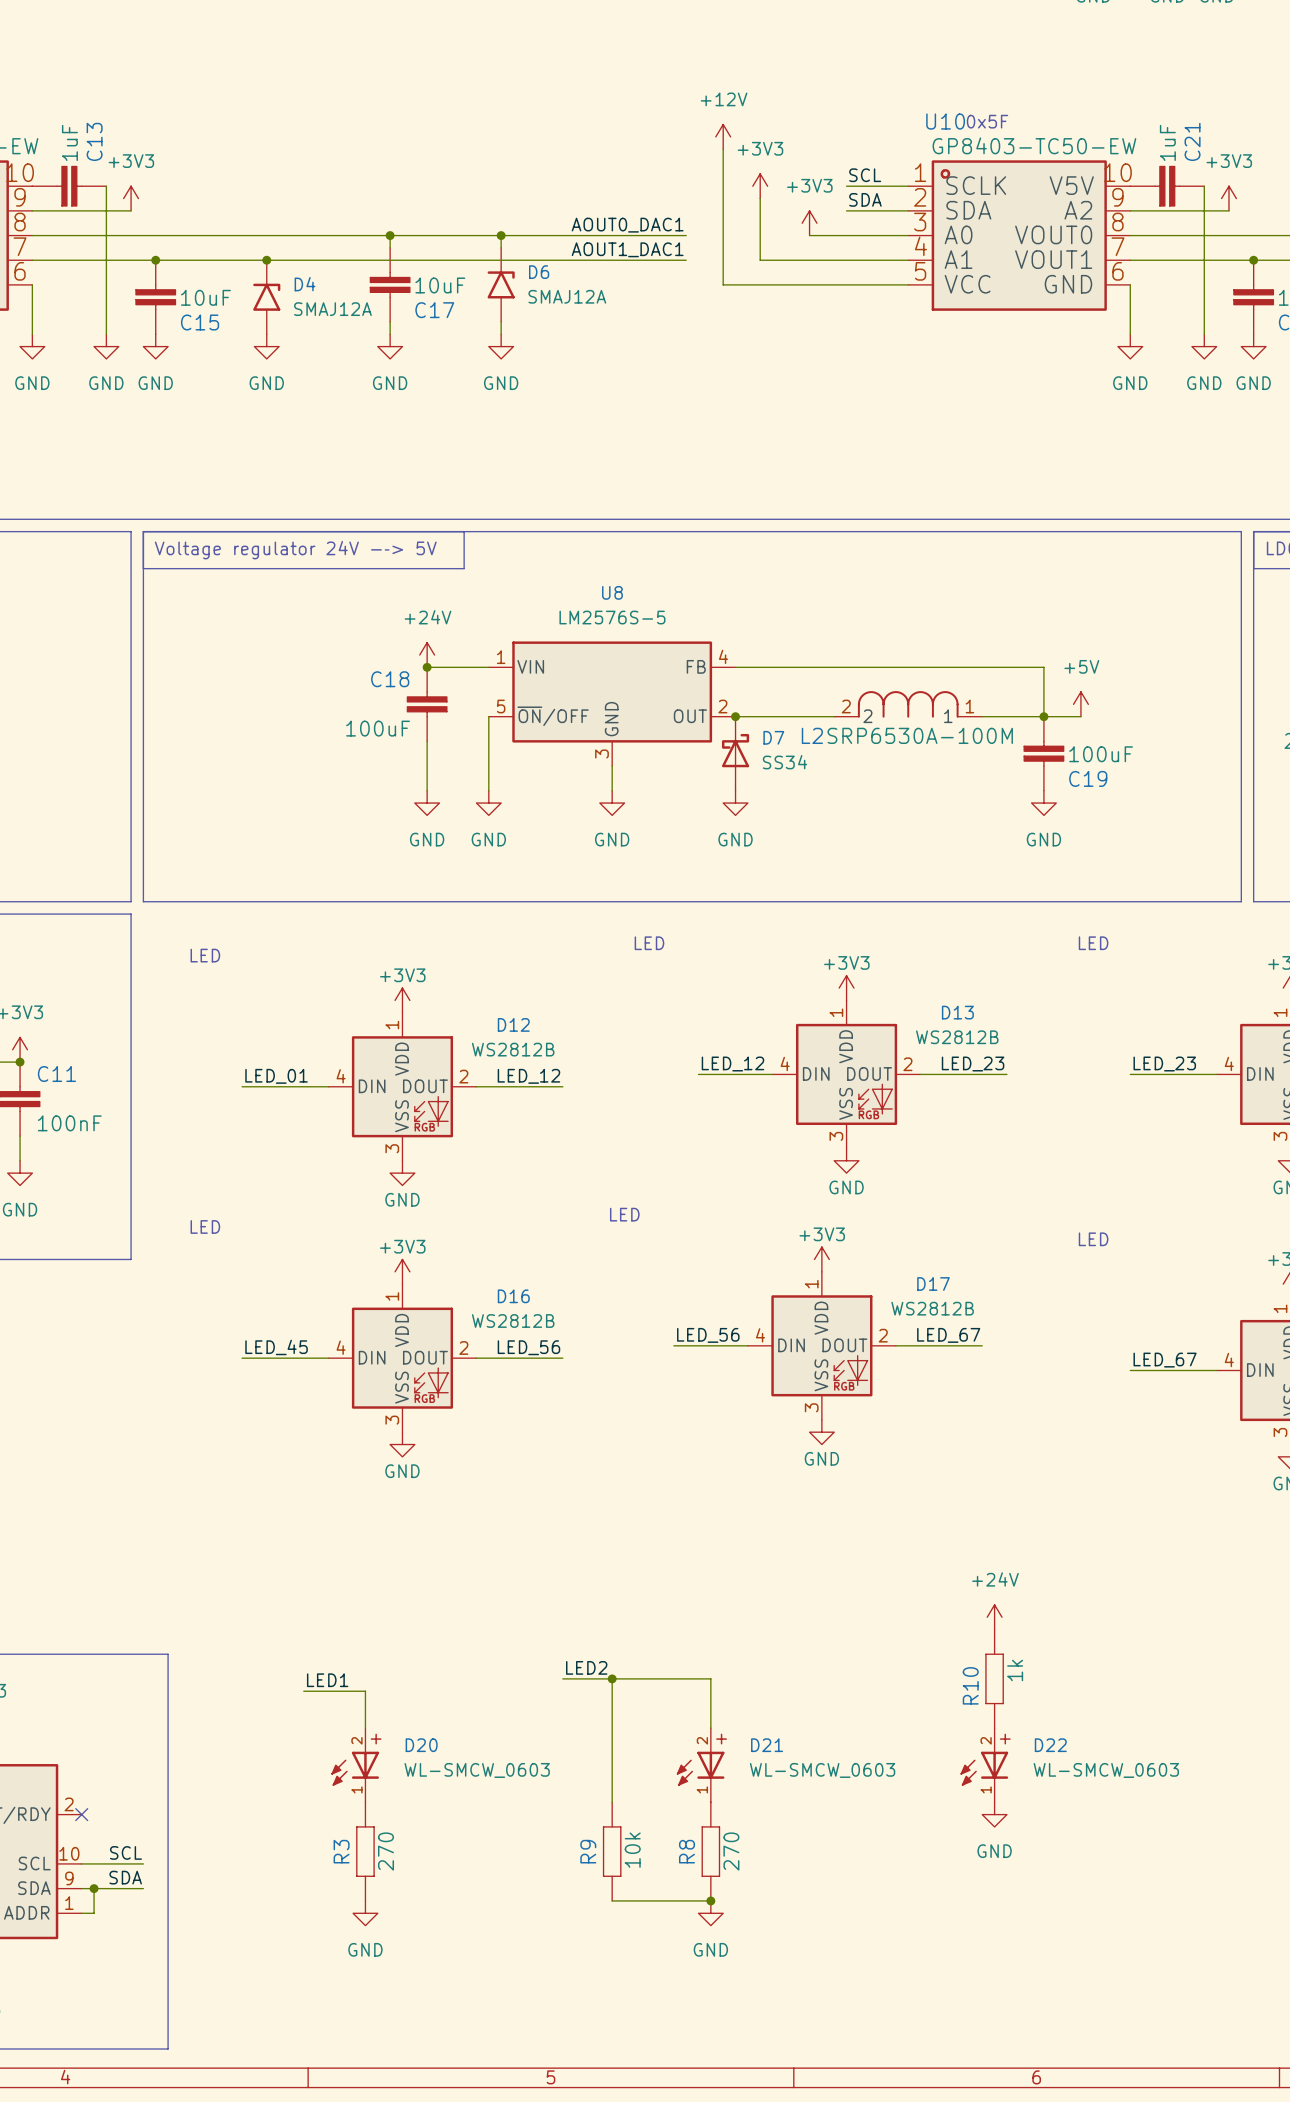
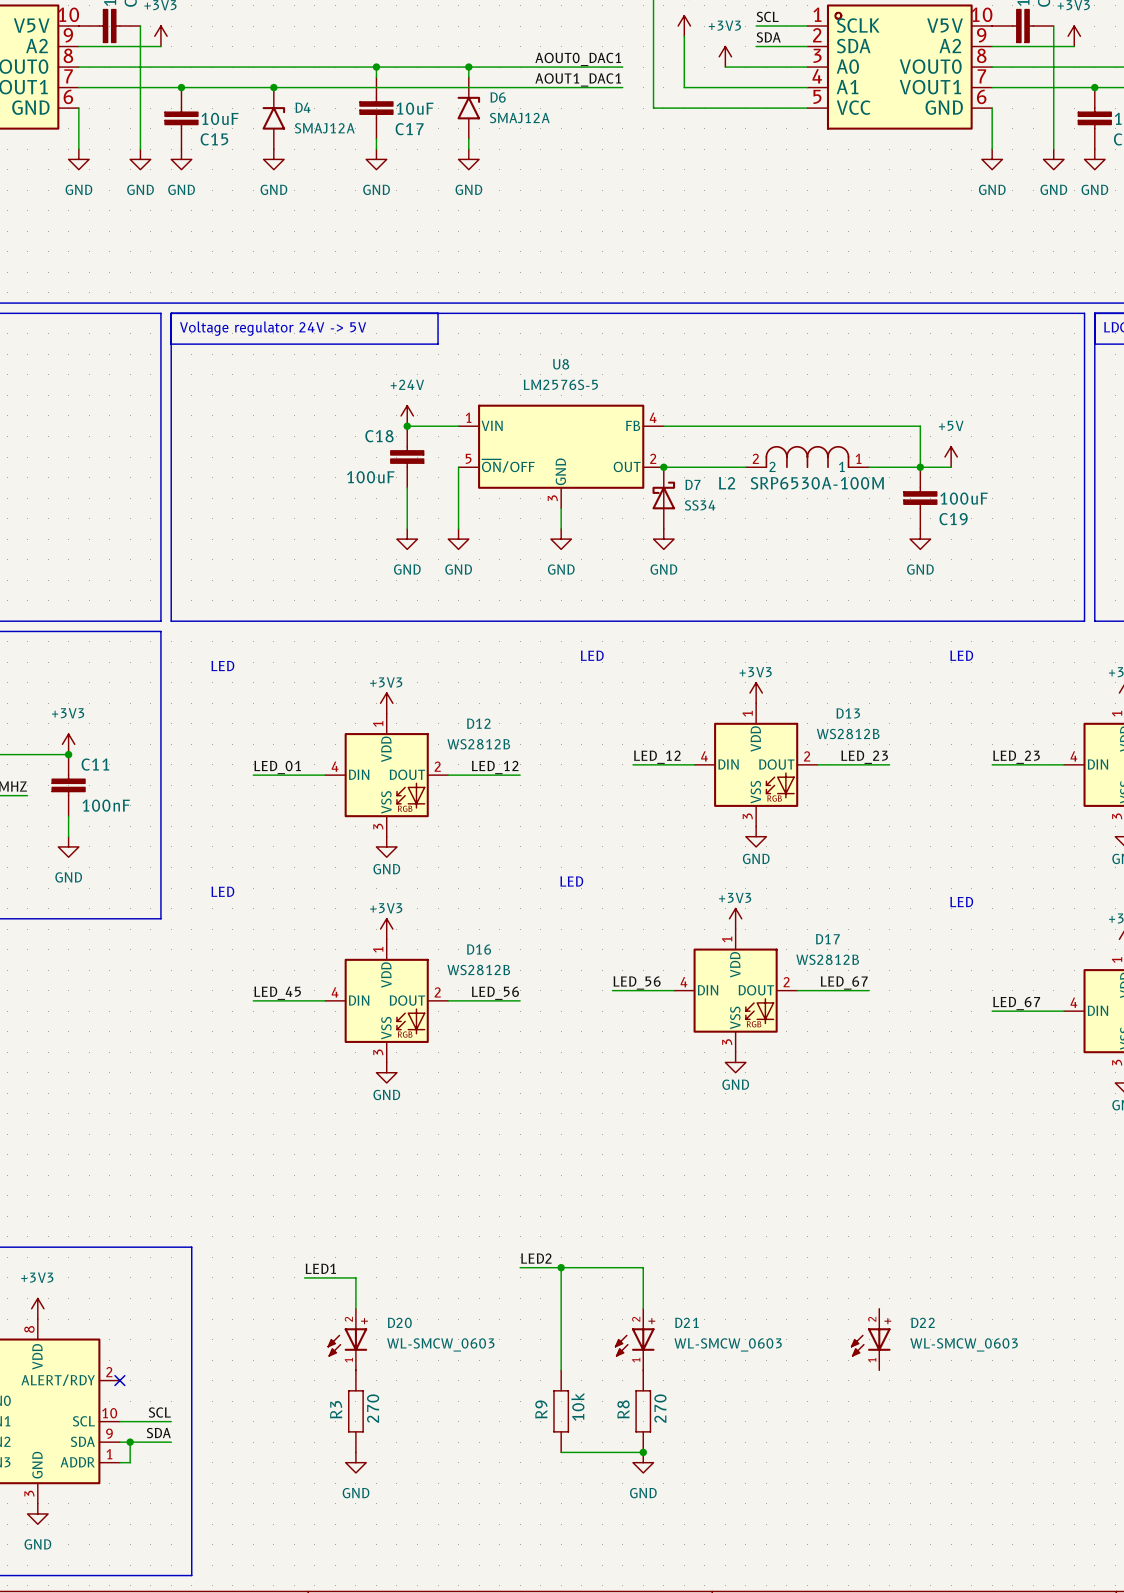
power symbol: +24V (994, 1617) -> none
R10: 1k (994, 1678) -> none
power symbol: GND (994, 1814) -> none

